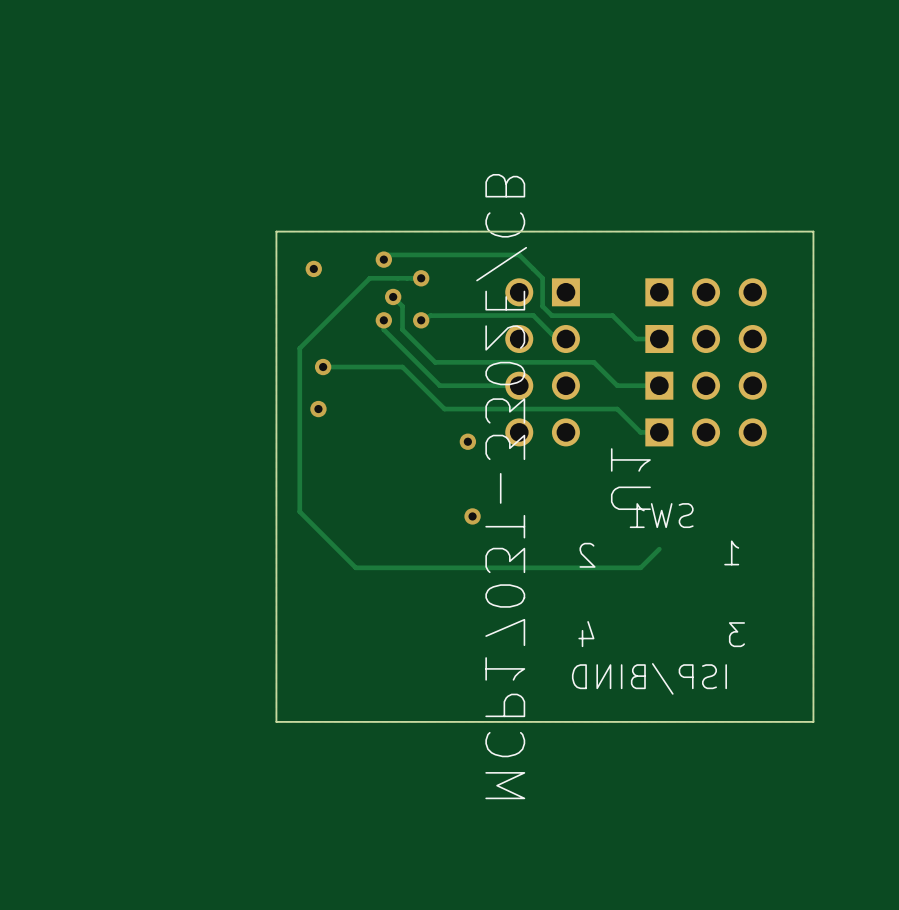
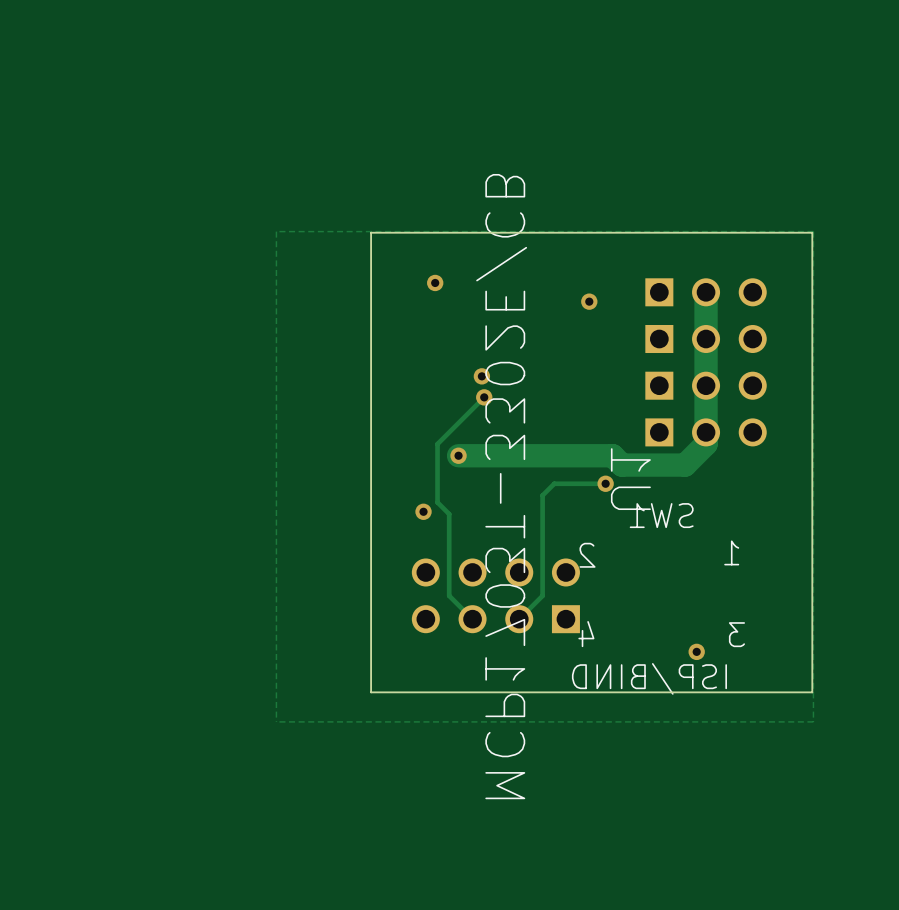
board edge: (813, 231) (813, 721) (276, 721) (276, 231) (813, 231) -> (812, 232) (812, 692) (371, 692) (371, 232) (812, 232)
track: (383, 259) (388, 254) (519, 254) (542, 278) (542, 306) (551, 315) (612, 315) (635, 339) (659, 339) -> none
via: (383, 259) -> none
via: (313, 268) -> none
track: (421, 278) (369, 278) (299, 348) (299, 511) (355, 567) (640, 567) (659, 549) -> none
via position: (421, 278) -> (435, 282)
track: none -> (706, 292) (706, 444) (685, 465) (621, 465) (612, 455) (458, 455)
track: (393, 296) (402, 306) (402, 329) (435, 362) (593, 362) (617, 385) (659, 385) -> none
via: (393, 296) -> none
via: none -> (589, 301)
track: (383, 320) (383, 329) (439, 385) (519, 385) -> none
via: (383, 320) -> none
track: (421, 320) (430, 315) (533, 315) (551, 334) (565, 339) -> none
via: (421, 320) -> none
part rotation: 0° (542, 362) -> 90° clockwise (495, 595)
part position: (542, 362) -> (495, 595)
track: (323, 367) (402, 367) (444, 409) (617, 409) (640, 432) (659, 432) -> none
via: (323, 367) -> none
via: none -> (481, 376)
track: none -> (484, 397) (437, 444) (437, 502) (449, 514) (449, 595) (472, 619)
via: none -> (484, 397)
via: (318, 409) -> none
via position: (467, 441) -> (458, 455)
track: none -> (605, 483) (554, 483) (542, 495) (542, 595) (519, 619)
via: none -> (605, 483)
via: none -> (423, 511)
via: (472, 516) -> none
via: none -> (696, 651)

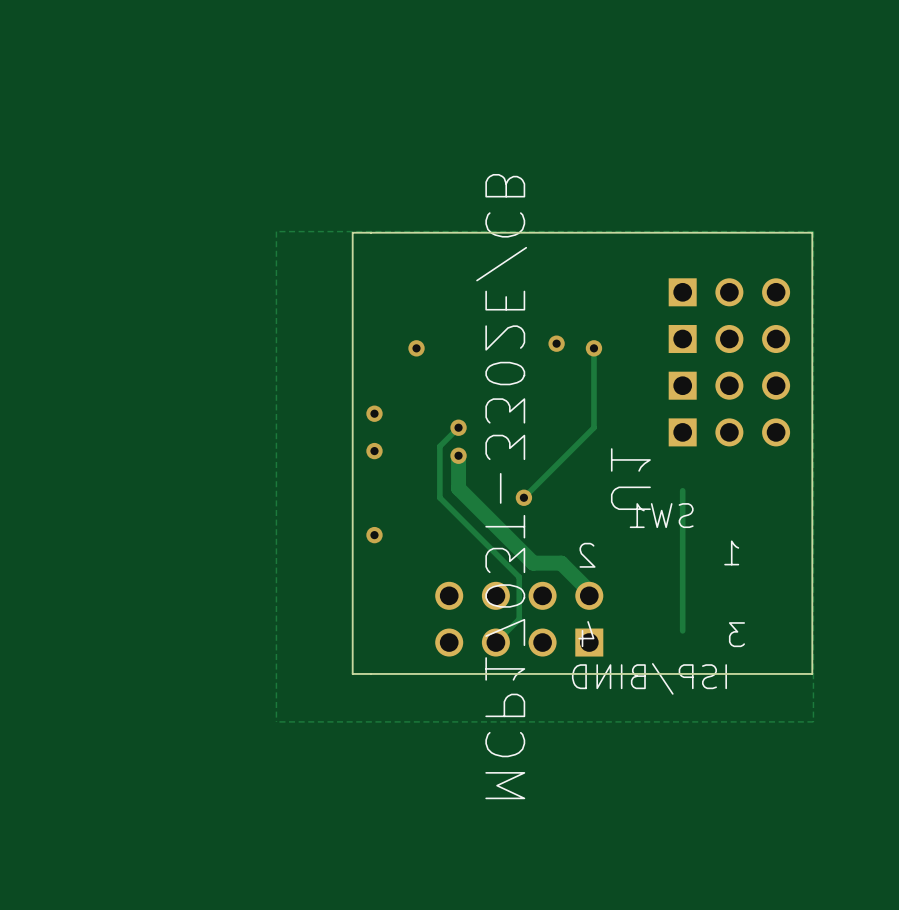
board edge: (371, 232) (371, 692) (812, 692) (812, 673) -> (371, 232) (352, 232) (352, 673) (812, 673)
via: (435, 282) -> none
track: (706, 292) (706, 444) (685, 465) (621, 465) (612, 455) (458, 455) -> (589, 595) (589, 591) (561, 563) (533, 563) (458, 488) (458, 455)
part position: (706, 292) -> (729, 292)
via: (589, 301) -> none
part position: (706, 339) -> (729, 339)
via: none -> (556, 343)
via: none -> (416, 348)
track: none -> (593, 348) (593, 427) (523, 497)
via: none -> (593, 348)
via: (481, 376) -> none
part position: (706, 385) -> (729, 385)
track: (484, 397) (437, 444) (437, 502) (449, 514) (449, 595) (472, 619) -> none
via: (484, 397) -> none
via: none -> (374, 413)
track: none -> (458, 427) (439, 446) (439, 497) (519, 577) (519, 619) (495, 642)
via: none -> (458, 427)
part position: (706, 432) -> (729, 432)
via: none -> (374, 451)
track: (605, 483) (554, 483) (542, 495) (542, 595) (519, 619) -> none
via: (605, 483) -> none
track: none -> (682, 490) (682, 630)
via: none -> (523, 497)
via: (423, 511) -> none
via: none -> (374, 535)
part position: (495, 595) -> (519, 619)
via: (696, 651) -> none

